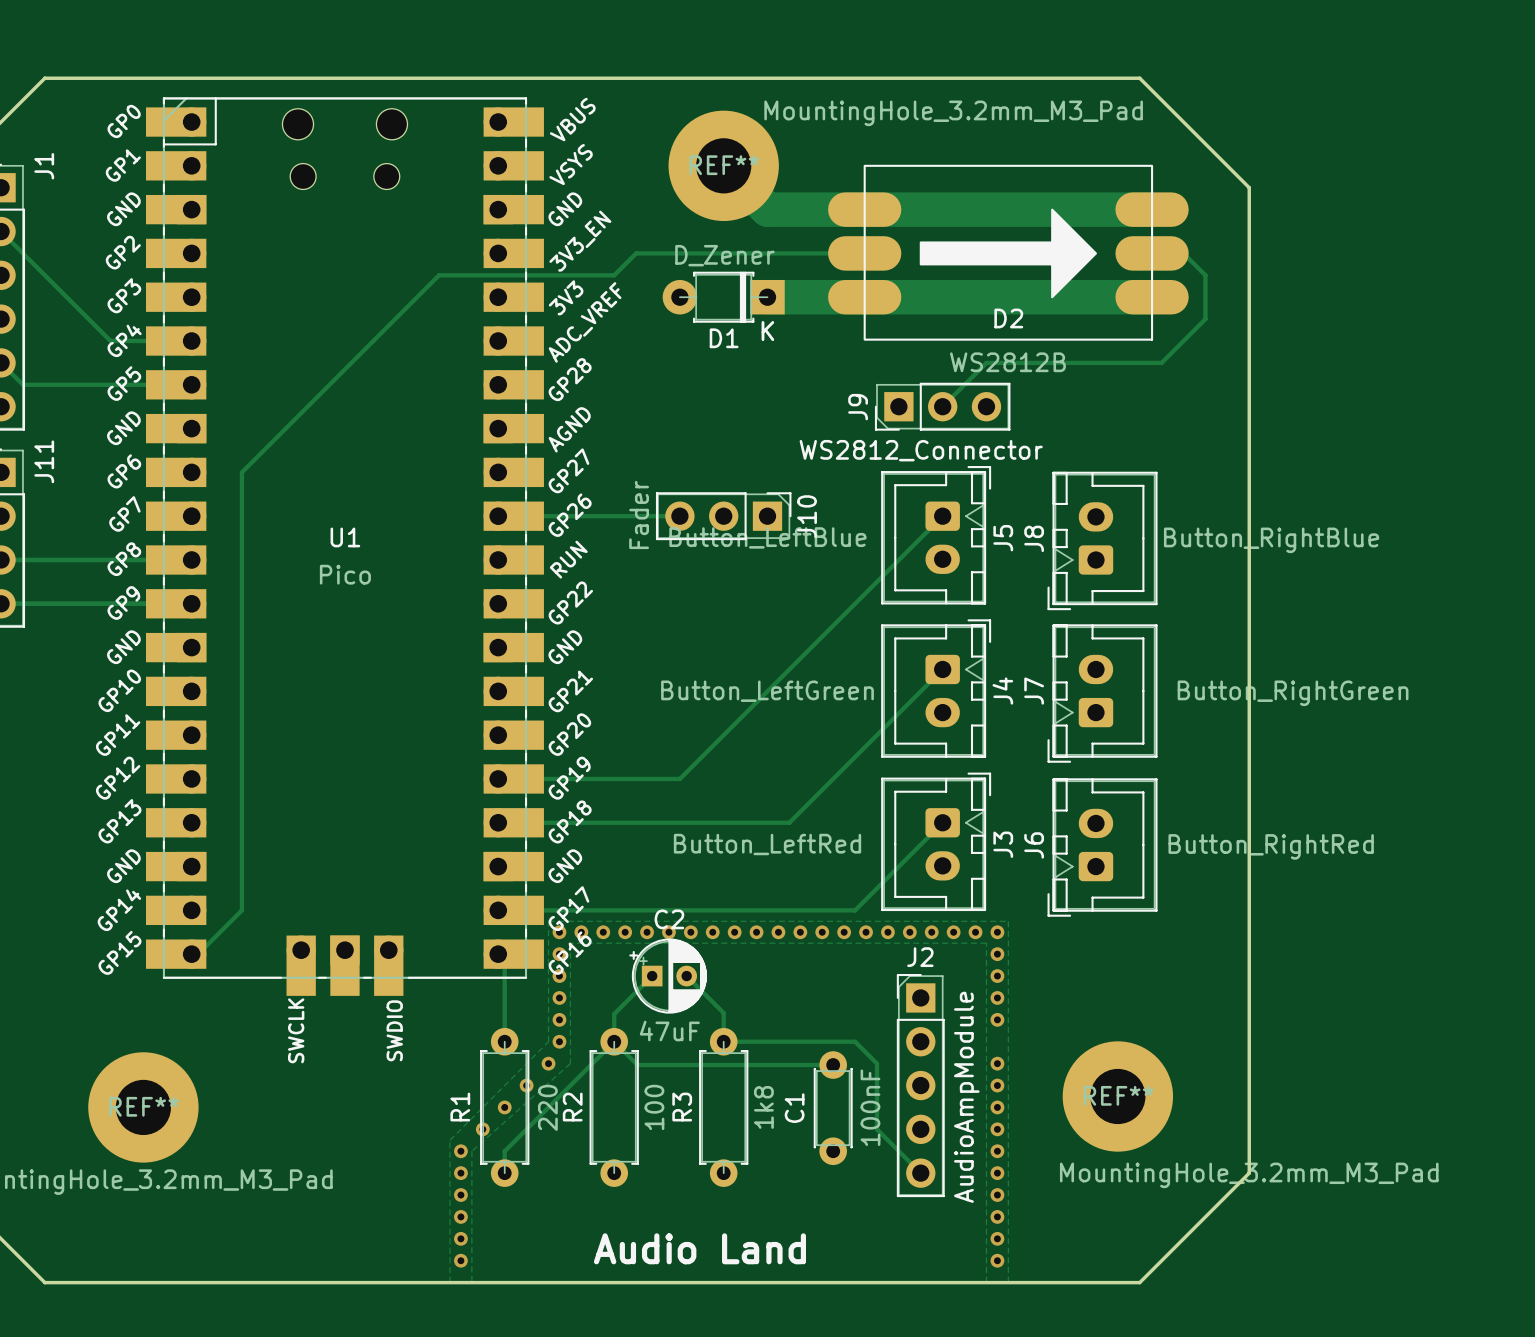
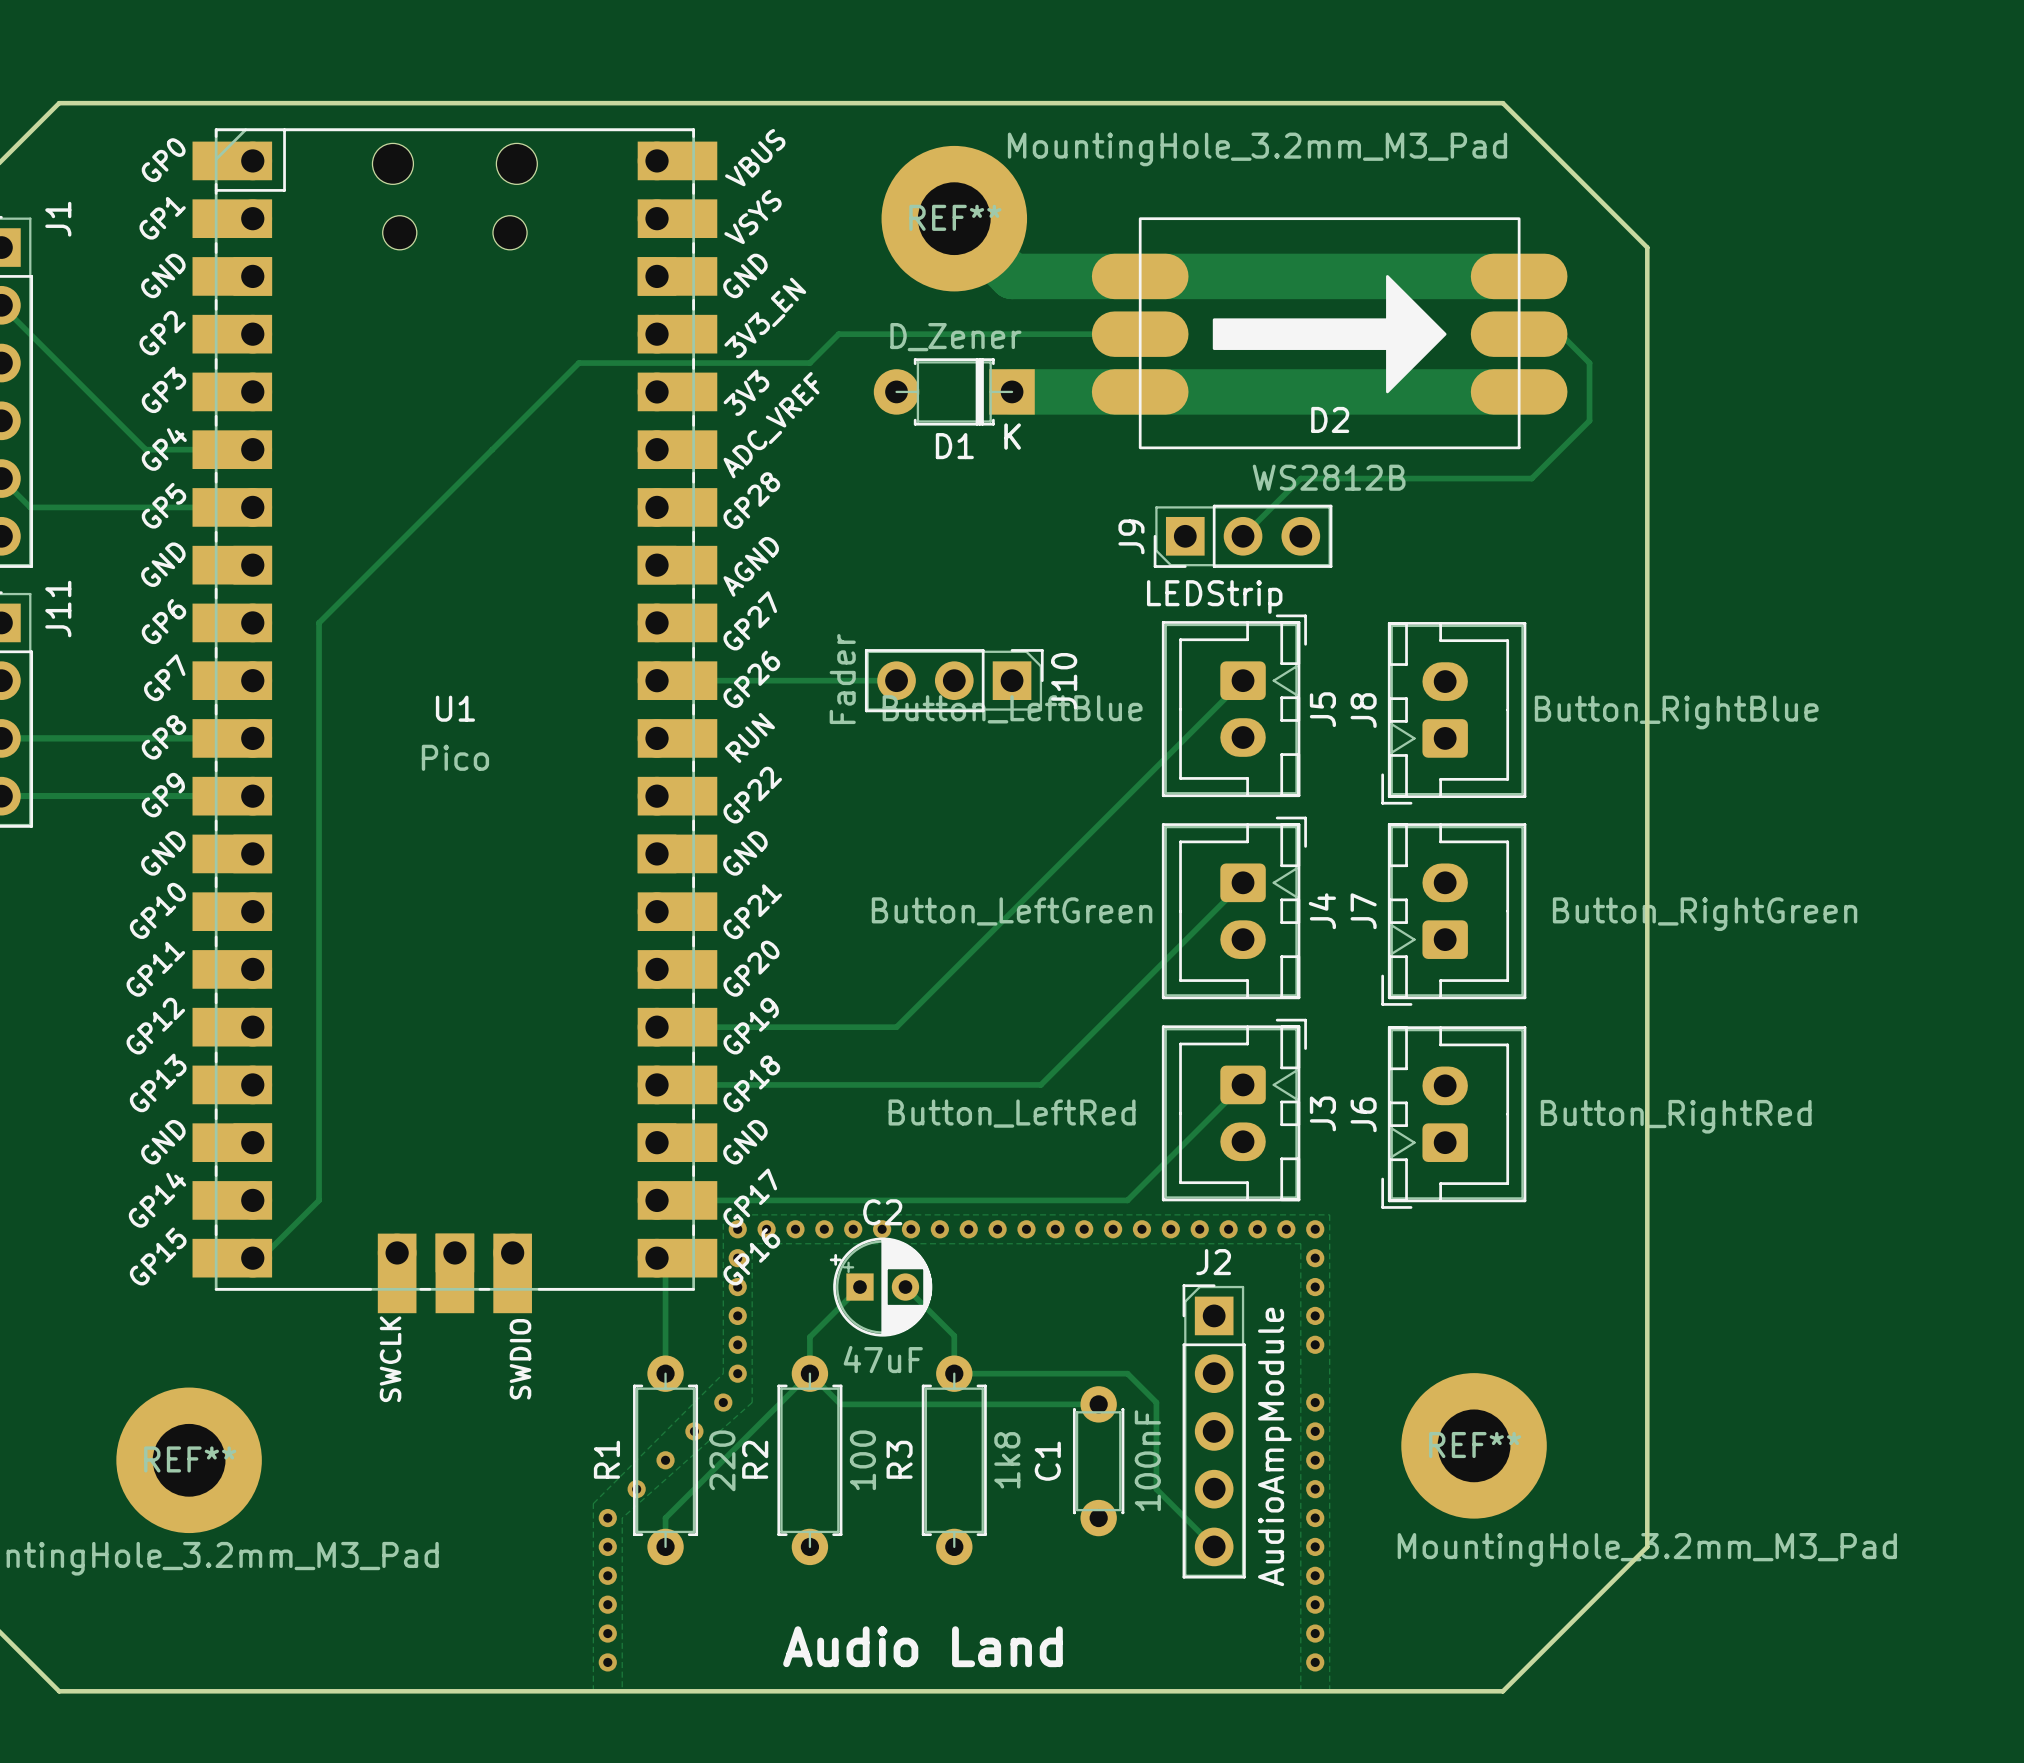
J9 value: WS2812_Connector (921, 450) -> LEDStrip (1214, 596)

